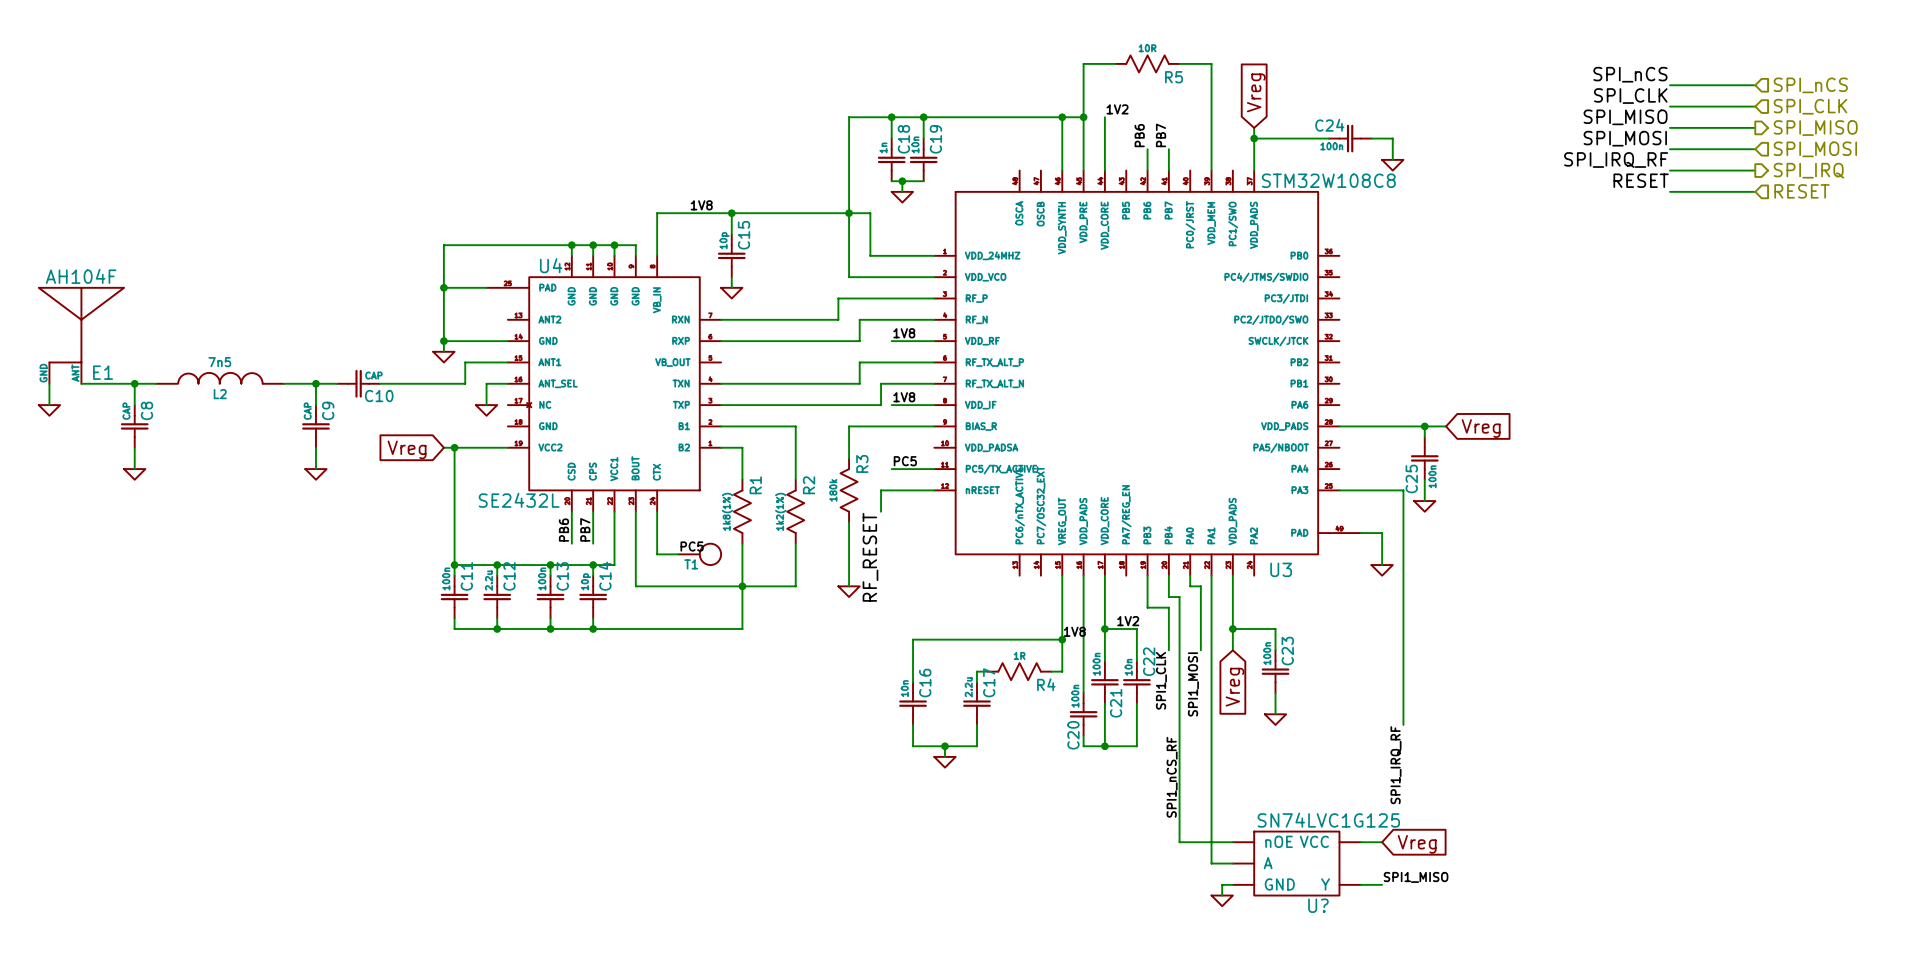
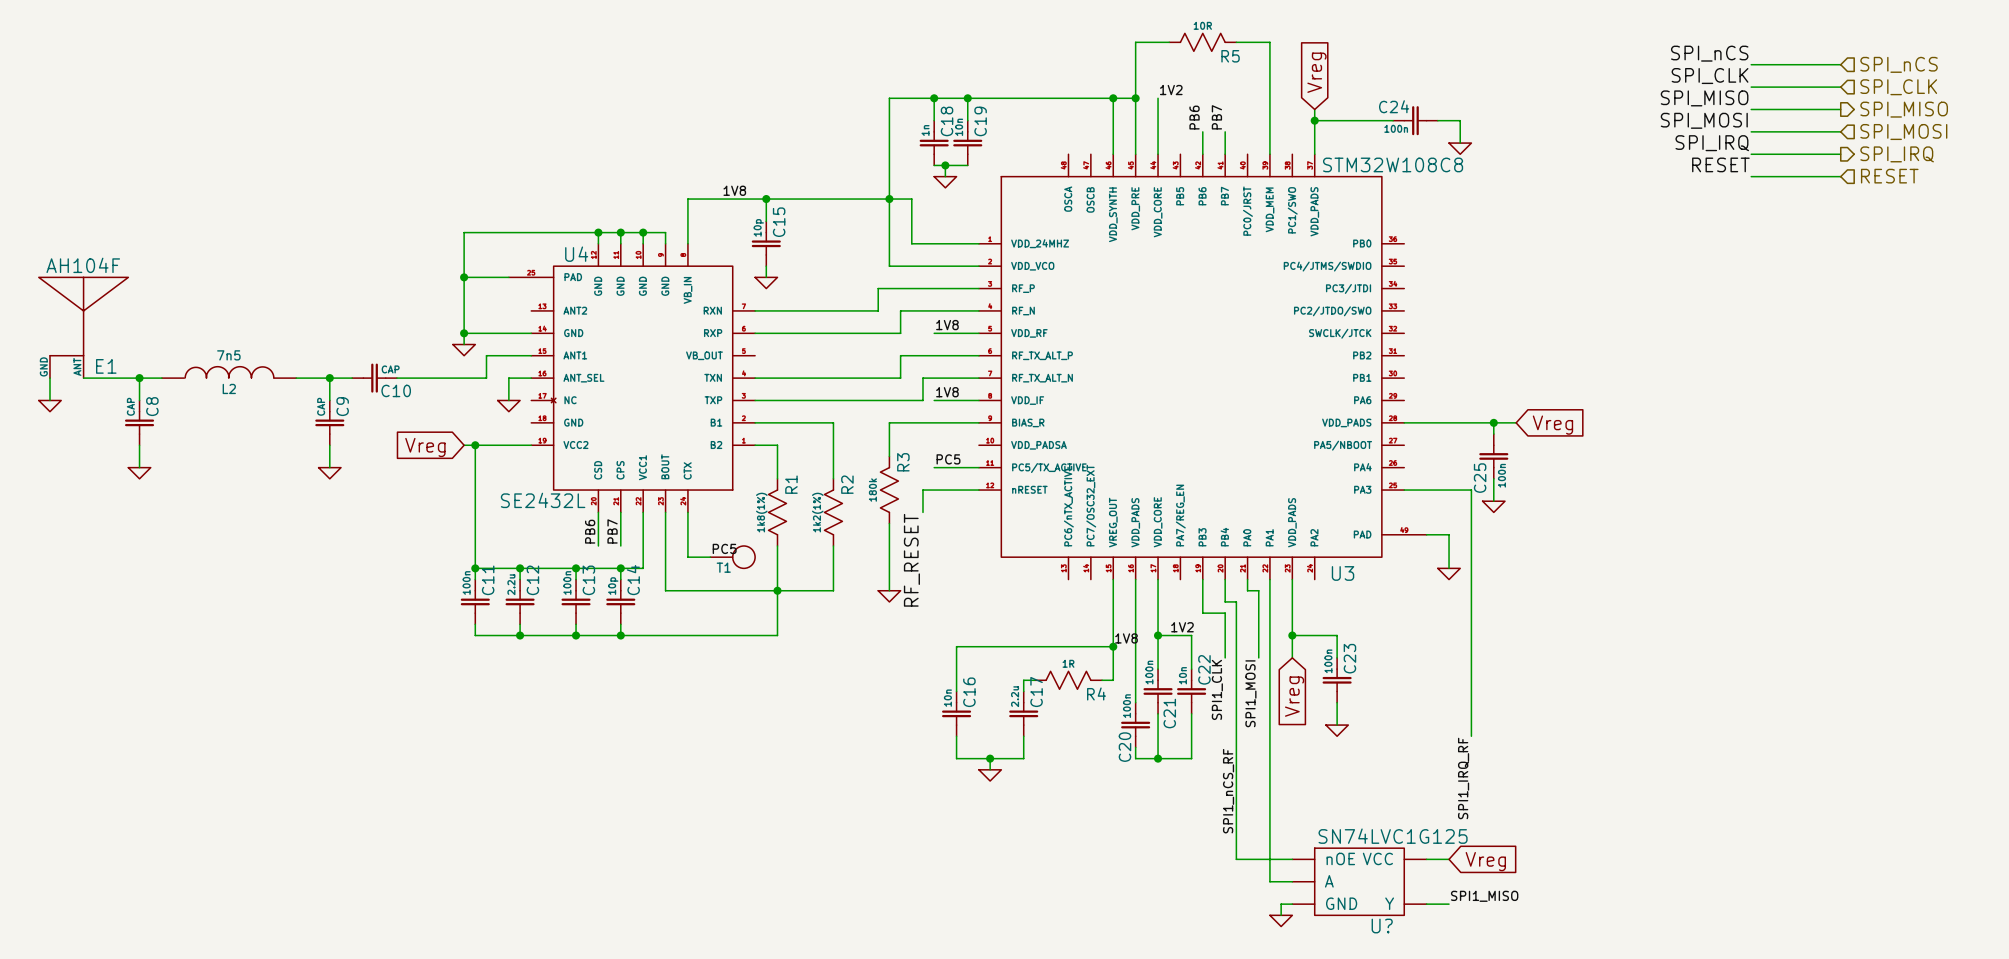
label: SPI_IRQ_RF (1616, 160) -> SPI_IRQ (1712, 143)

